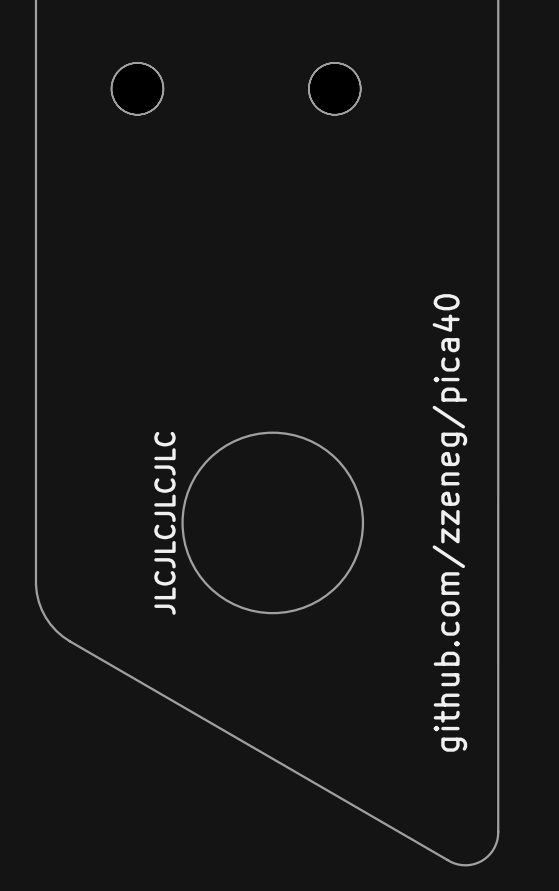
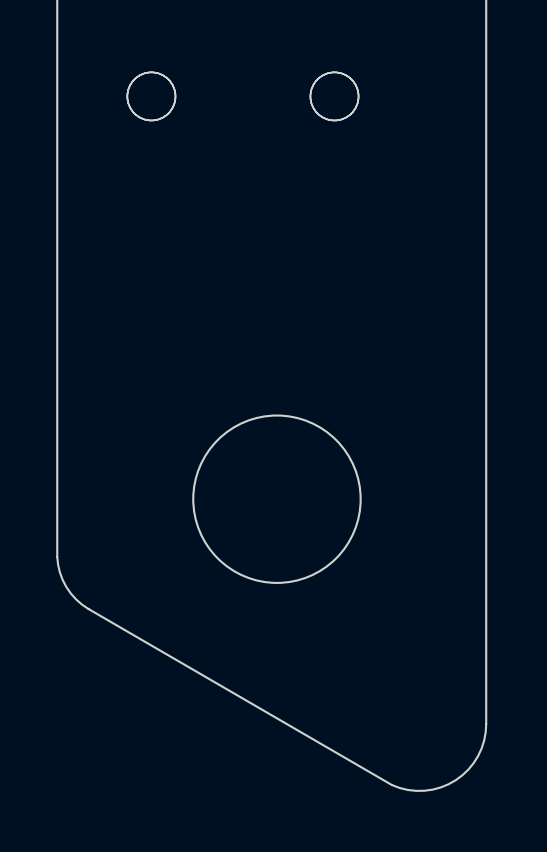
text: github.com/zzeneg/pica40 (449, 522) -> none
text: JLCJLCJLCJLC (164, 523) -> none
board edge: (69, 641) (454, 863) (466, 865) (477, 862) (487, 856) (494, 847) (498, 835) (498, 765) -> (88, 609) (399, 788) (416, 790) (432, 789) (455, 780) (468, 769) (478, 756) (484, 740) (486, 724)

